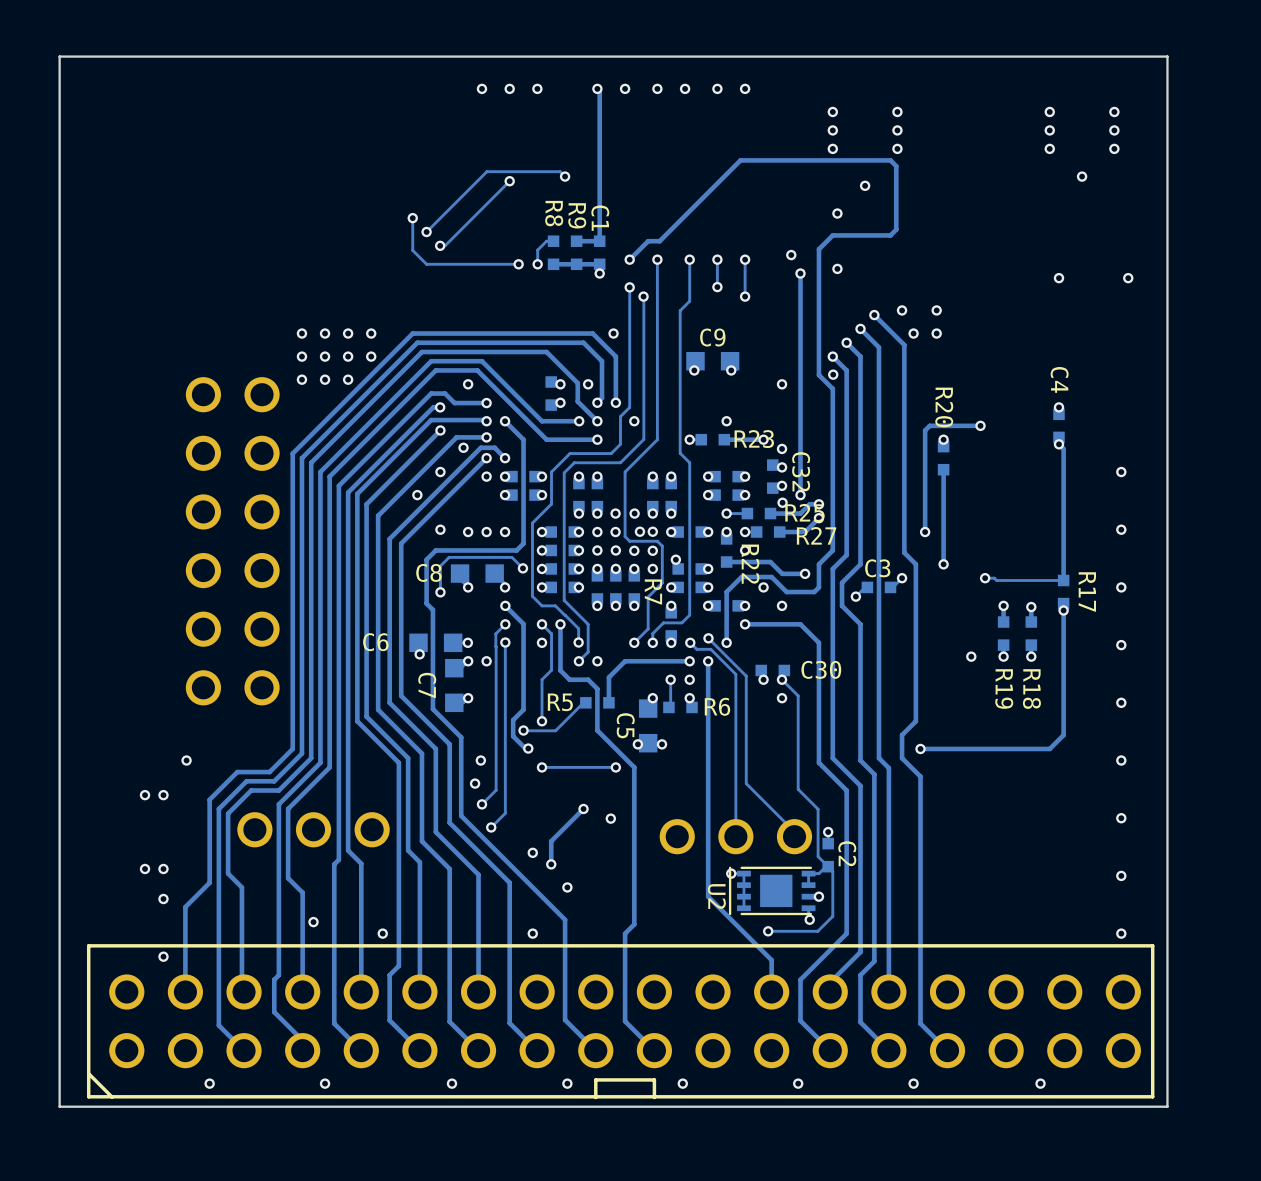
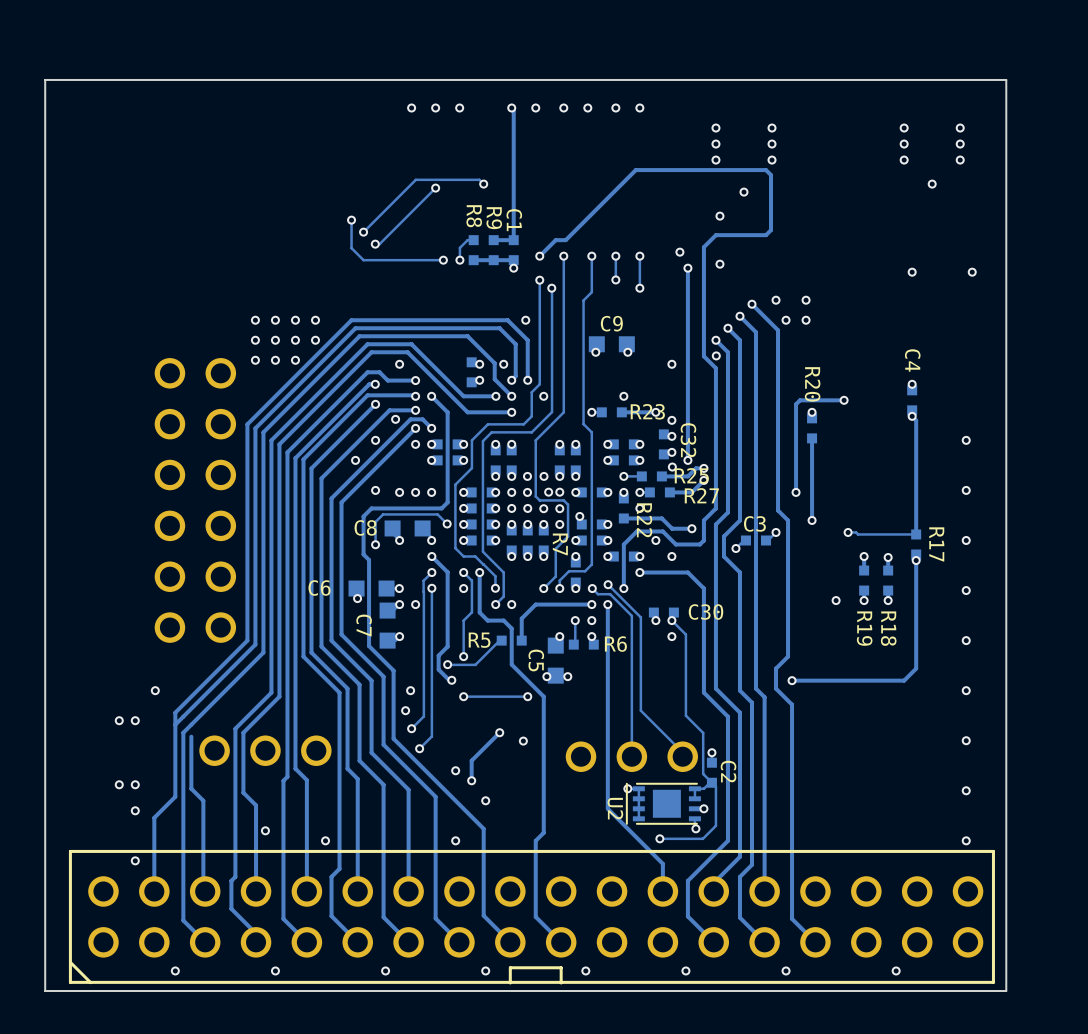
track: (292, 702) (292, 748) (269, 772) (237, 772) -> (255, 644) (199, 700)
track: none -> (247, 640) (175, 712) (175, 724)
track: (301, 707) (301, 753) (274, 781) (246, 781) -> (263, 652) (207, 708)
track: (311, 716) (311, 758) (278, 790) (251, 790) (228, 813) -> none

